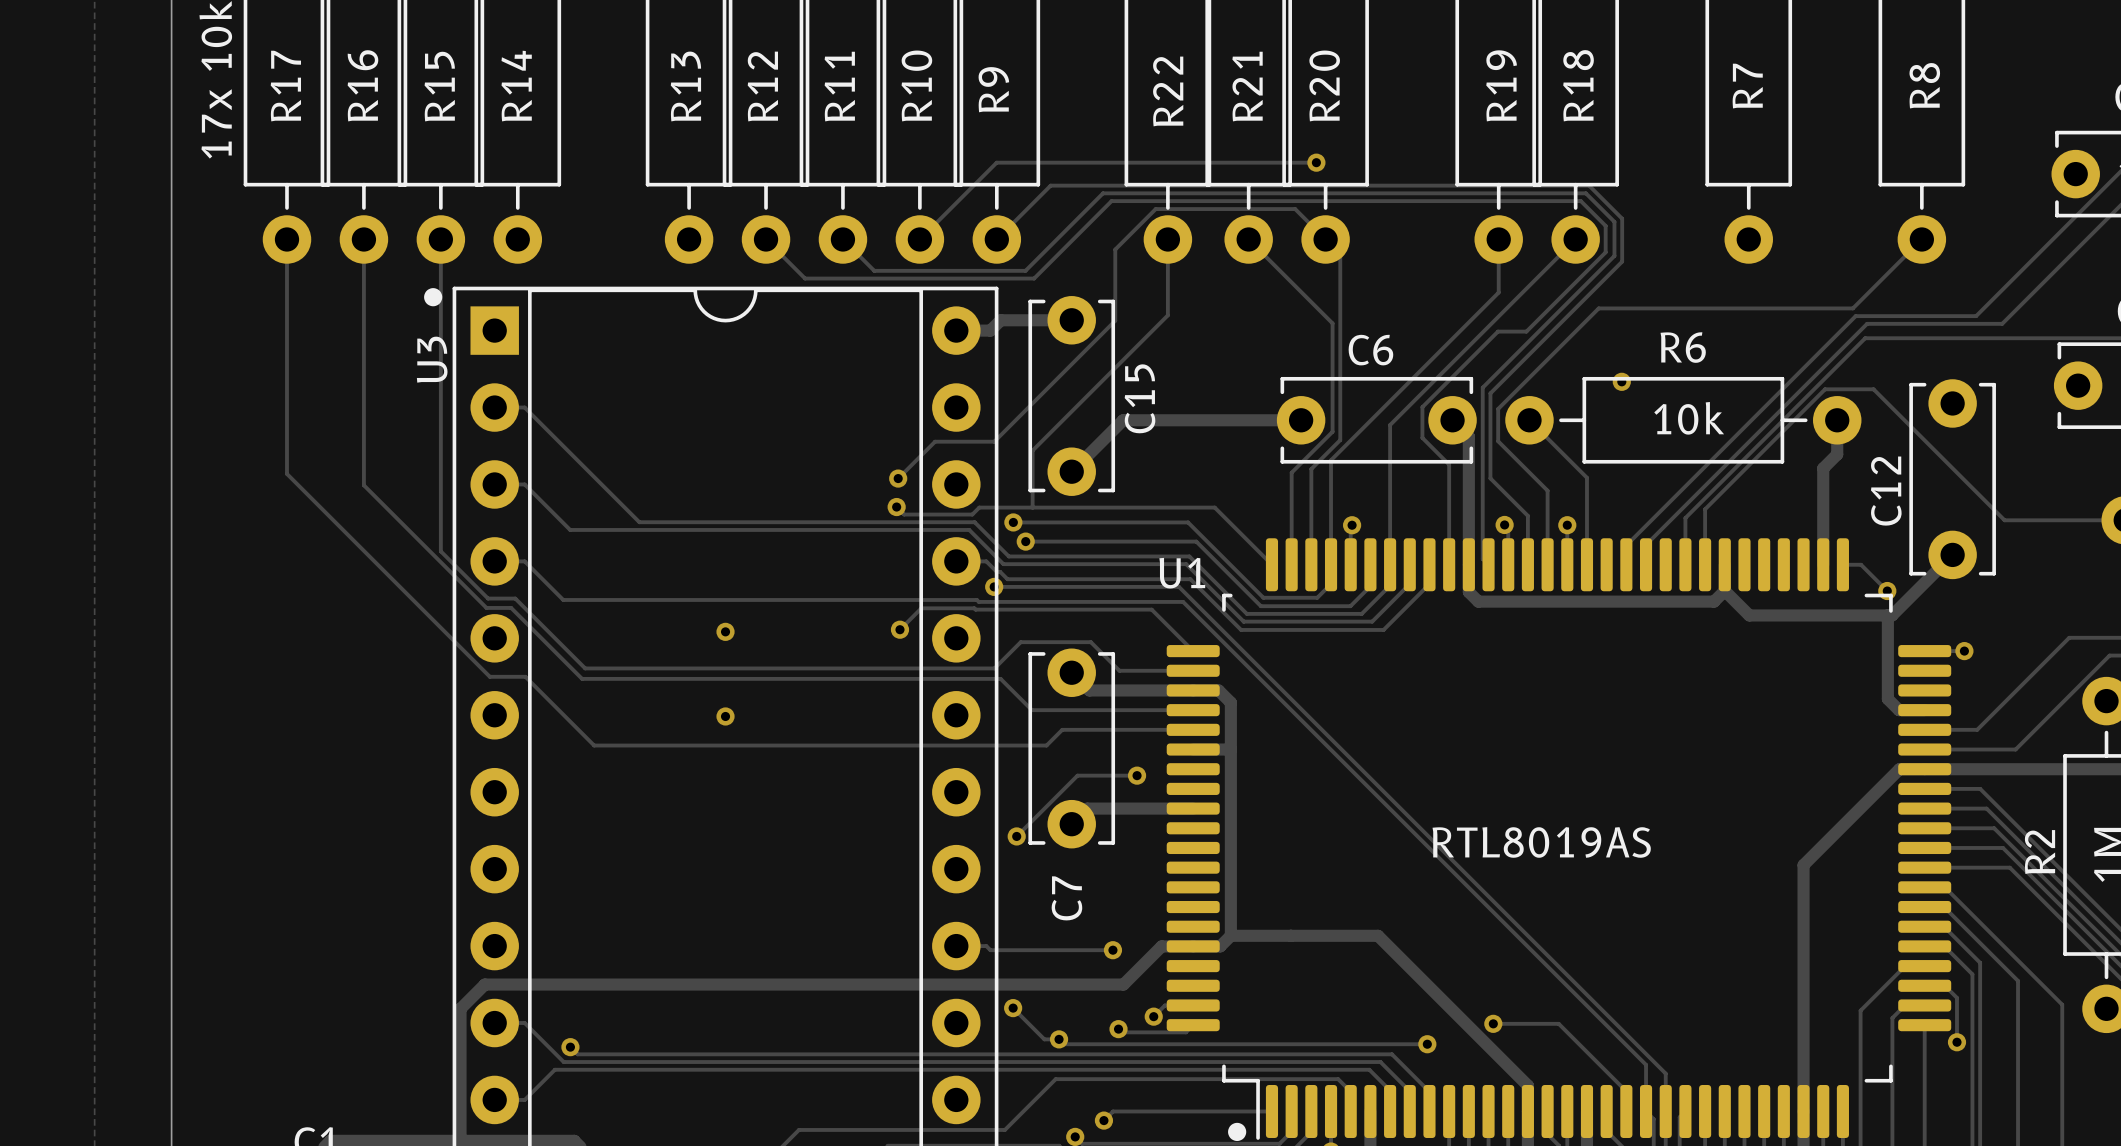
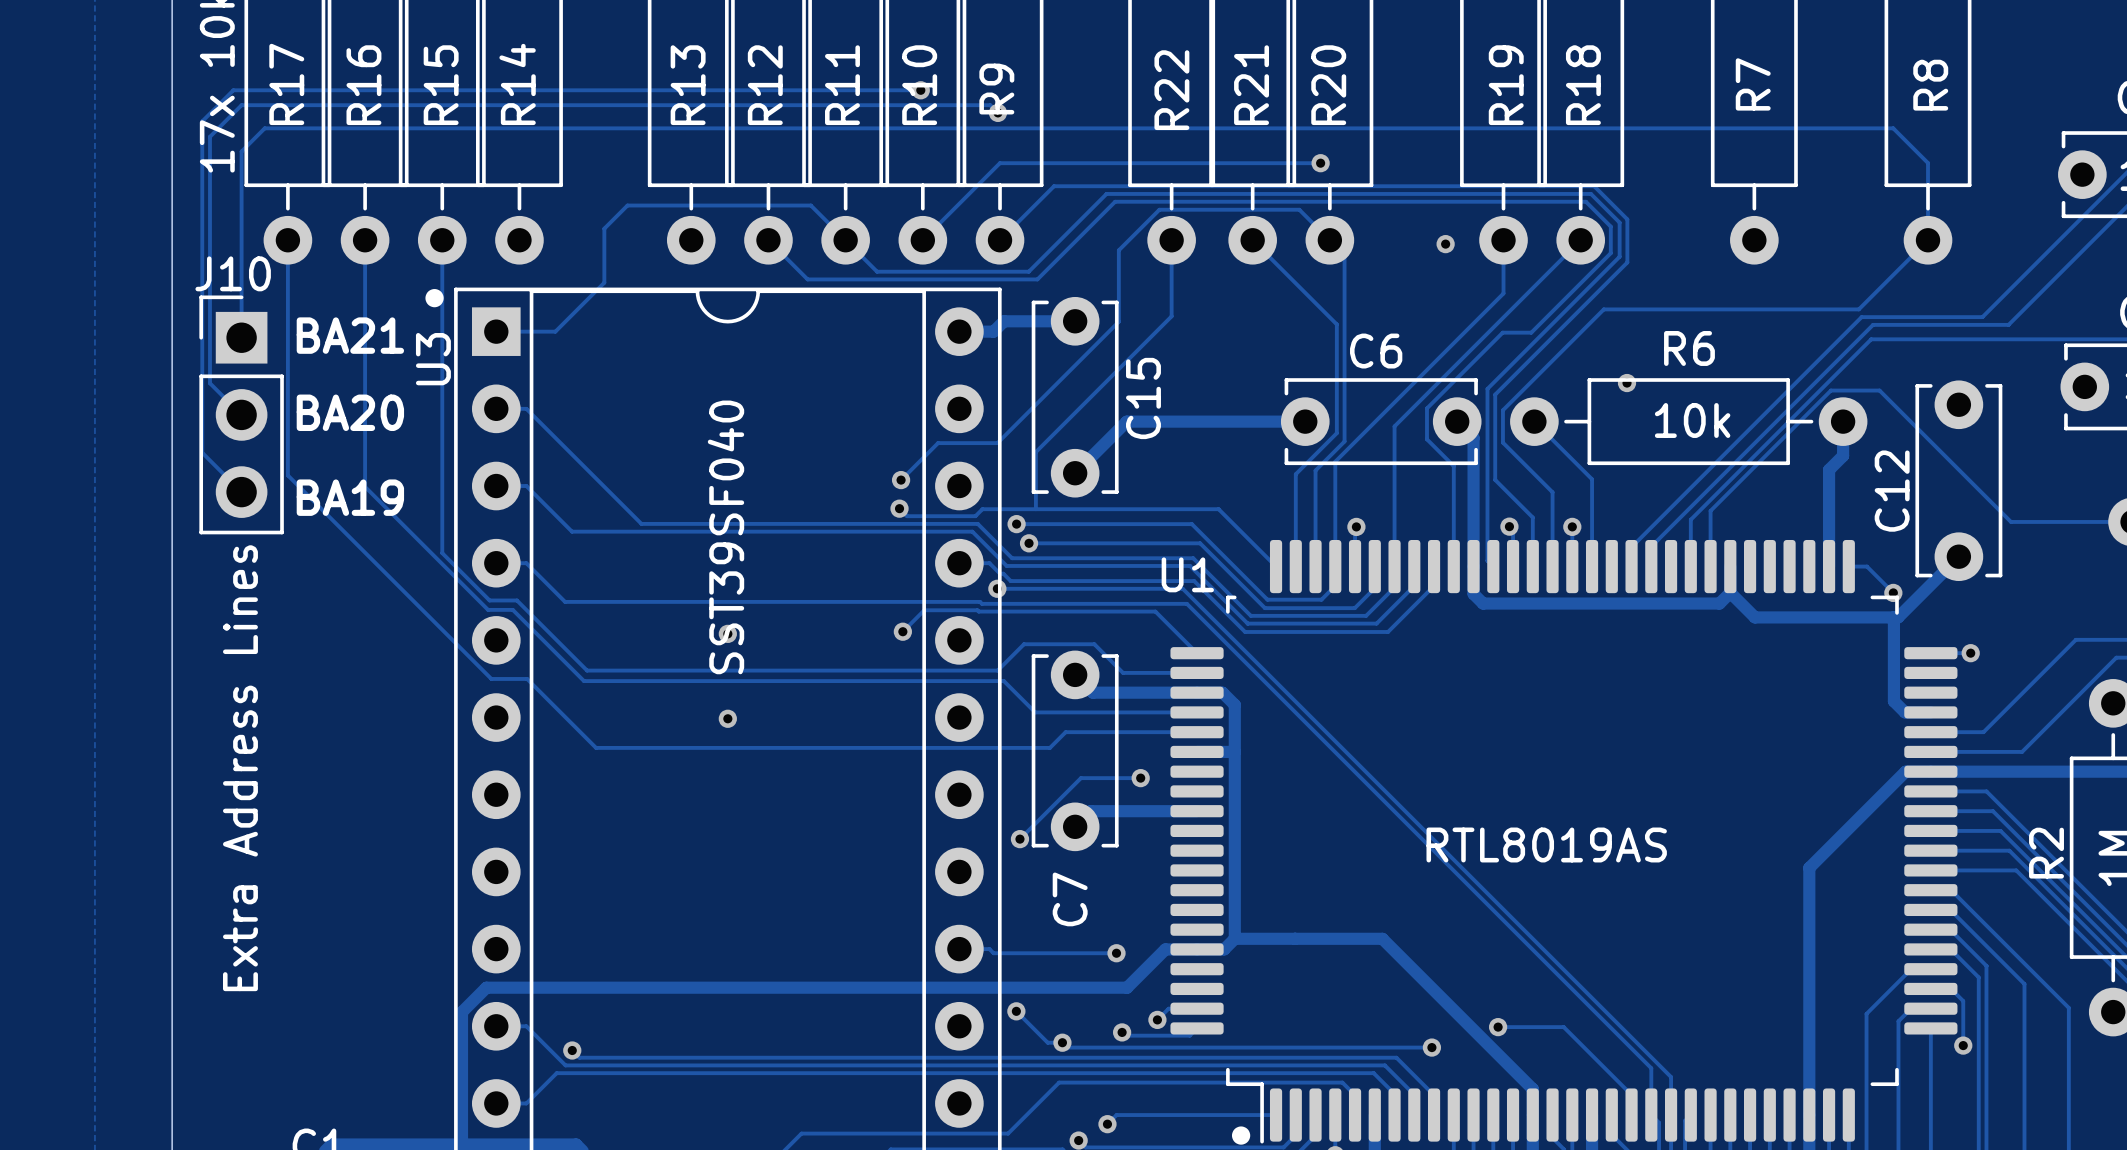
track: none -> (920, 90) (233, 90) (202, 121) (202, 452) (241, 492)
via: none -> (920, 90)
track: none -> (997, 112) (990, 105) (241, 105) (209, 136) (209, 383) (241, 414)
via: none -> (997, 112)
track: none -> (845, 240) (810, 205) (627, 205) (604, 228) (604, 282) (555, 331) (496, 331)
track: none -> (1928, 240) (1928, 163) (1893, 128) (264, 128) (241, 151) (241, 337)
via: none -> (1445, 244)
text: none -> BA21 (350, 335)
text: none -> BA20 (350, 412)
J10: none -> Extra Address Lines (241, 414)
text: none -> BA19 (350, 497)
U3 value: none -> SST39SF040 (725, 537)

